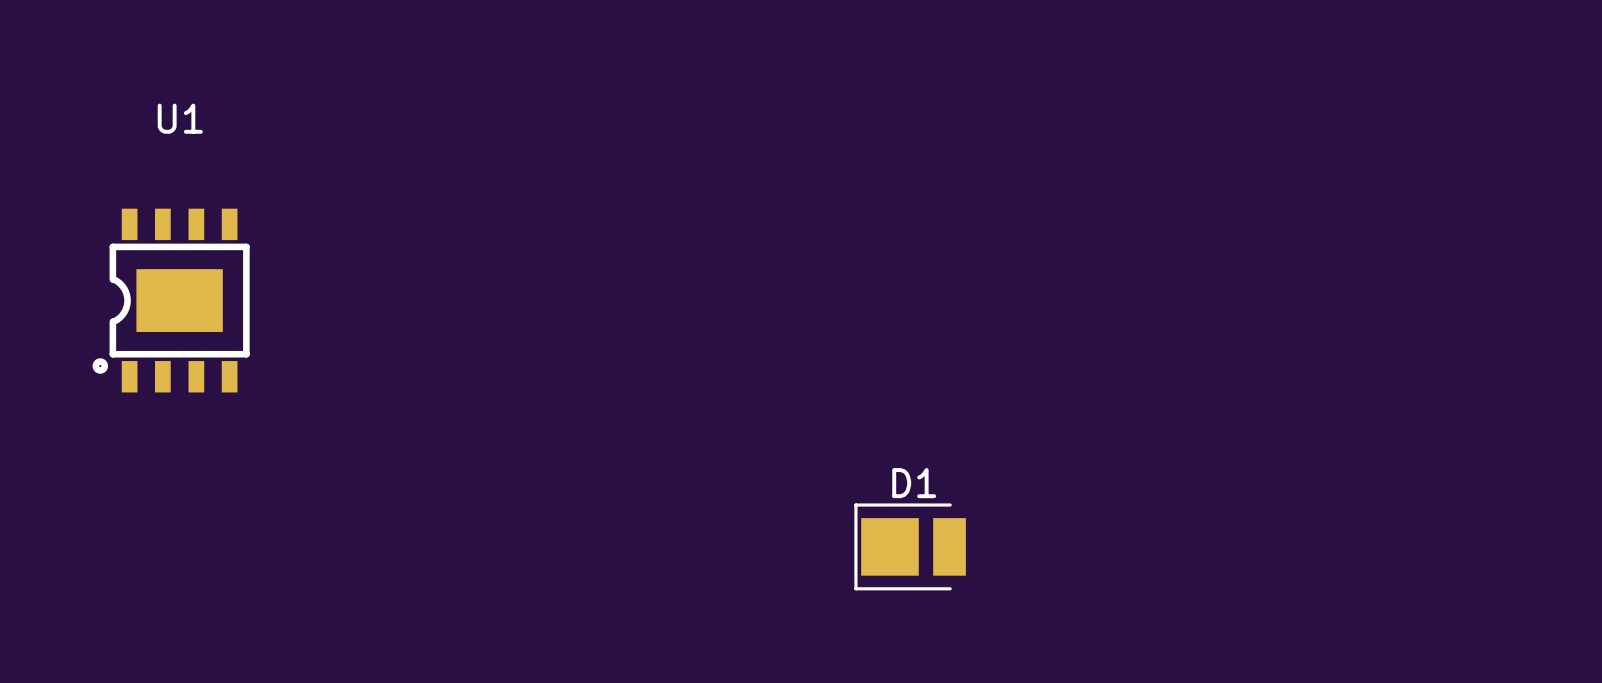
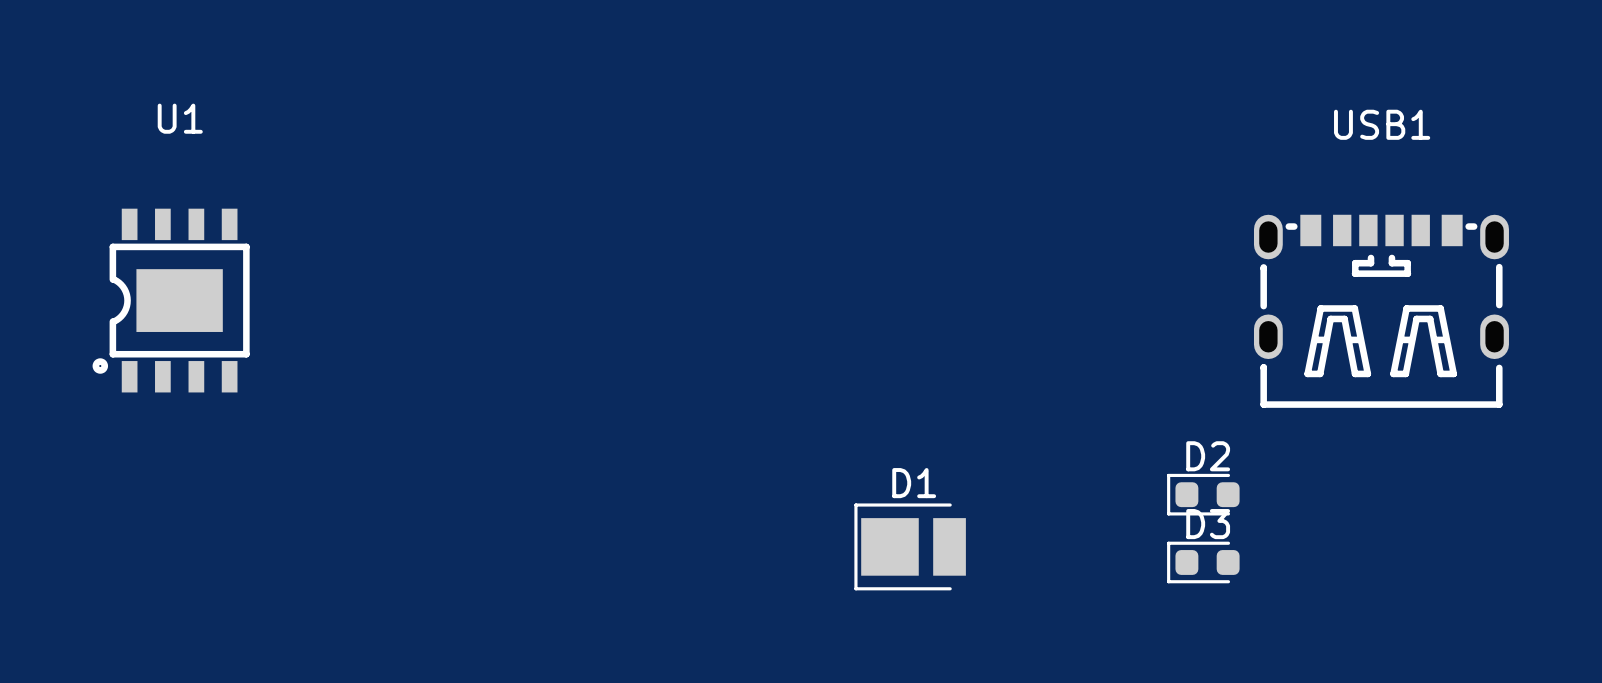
USB1: none -> (1381, 311)
D2: none -> (1203, 494)
D3: none -> (1203, 562)

